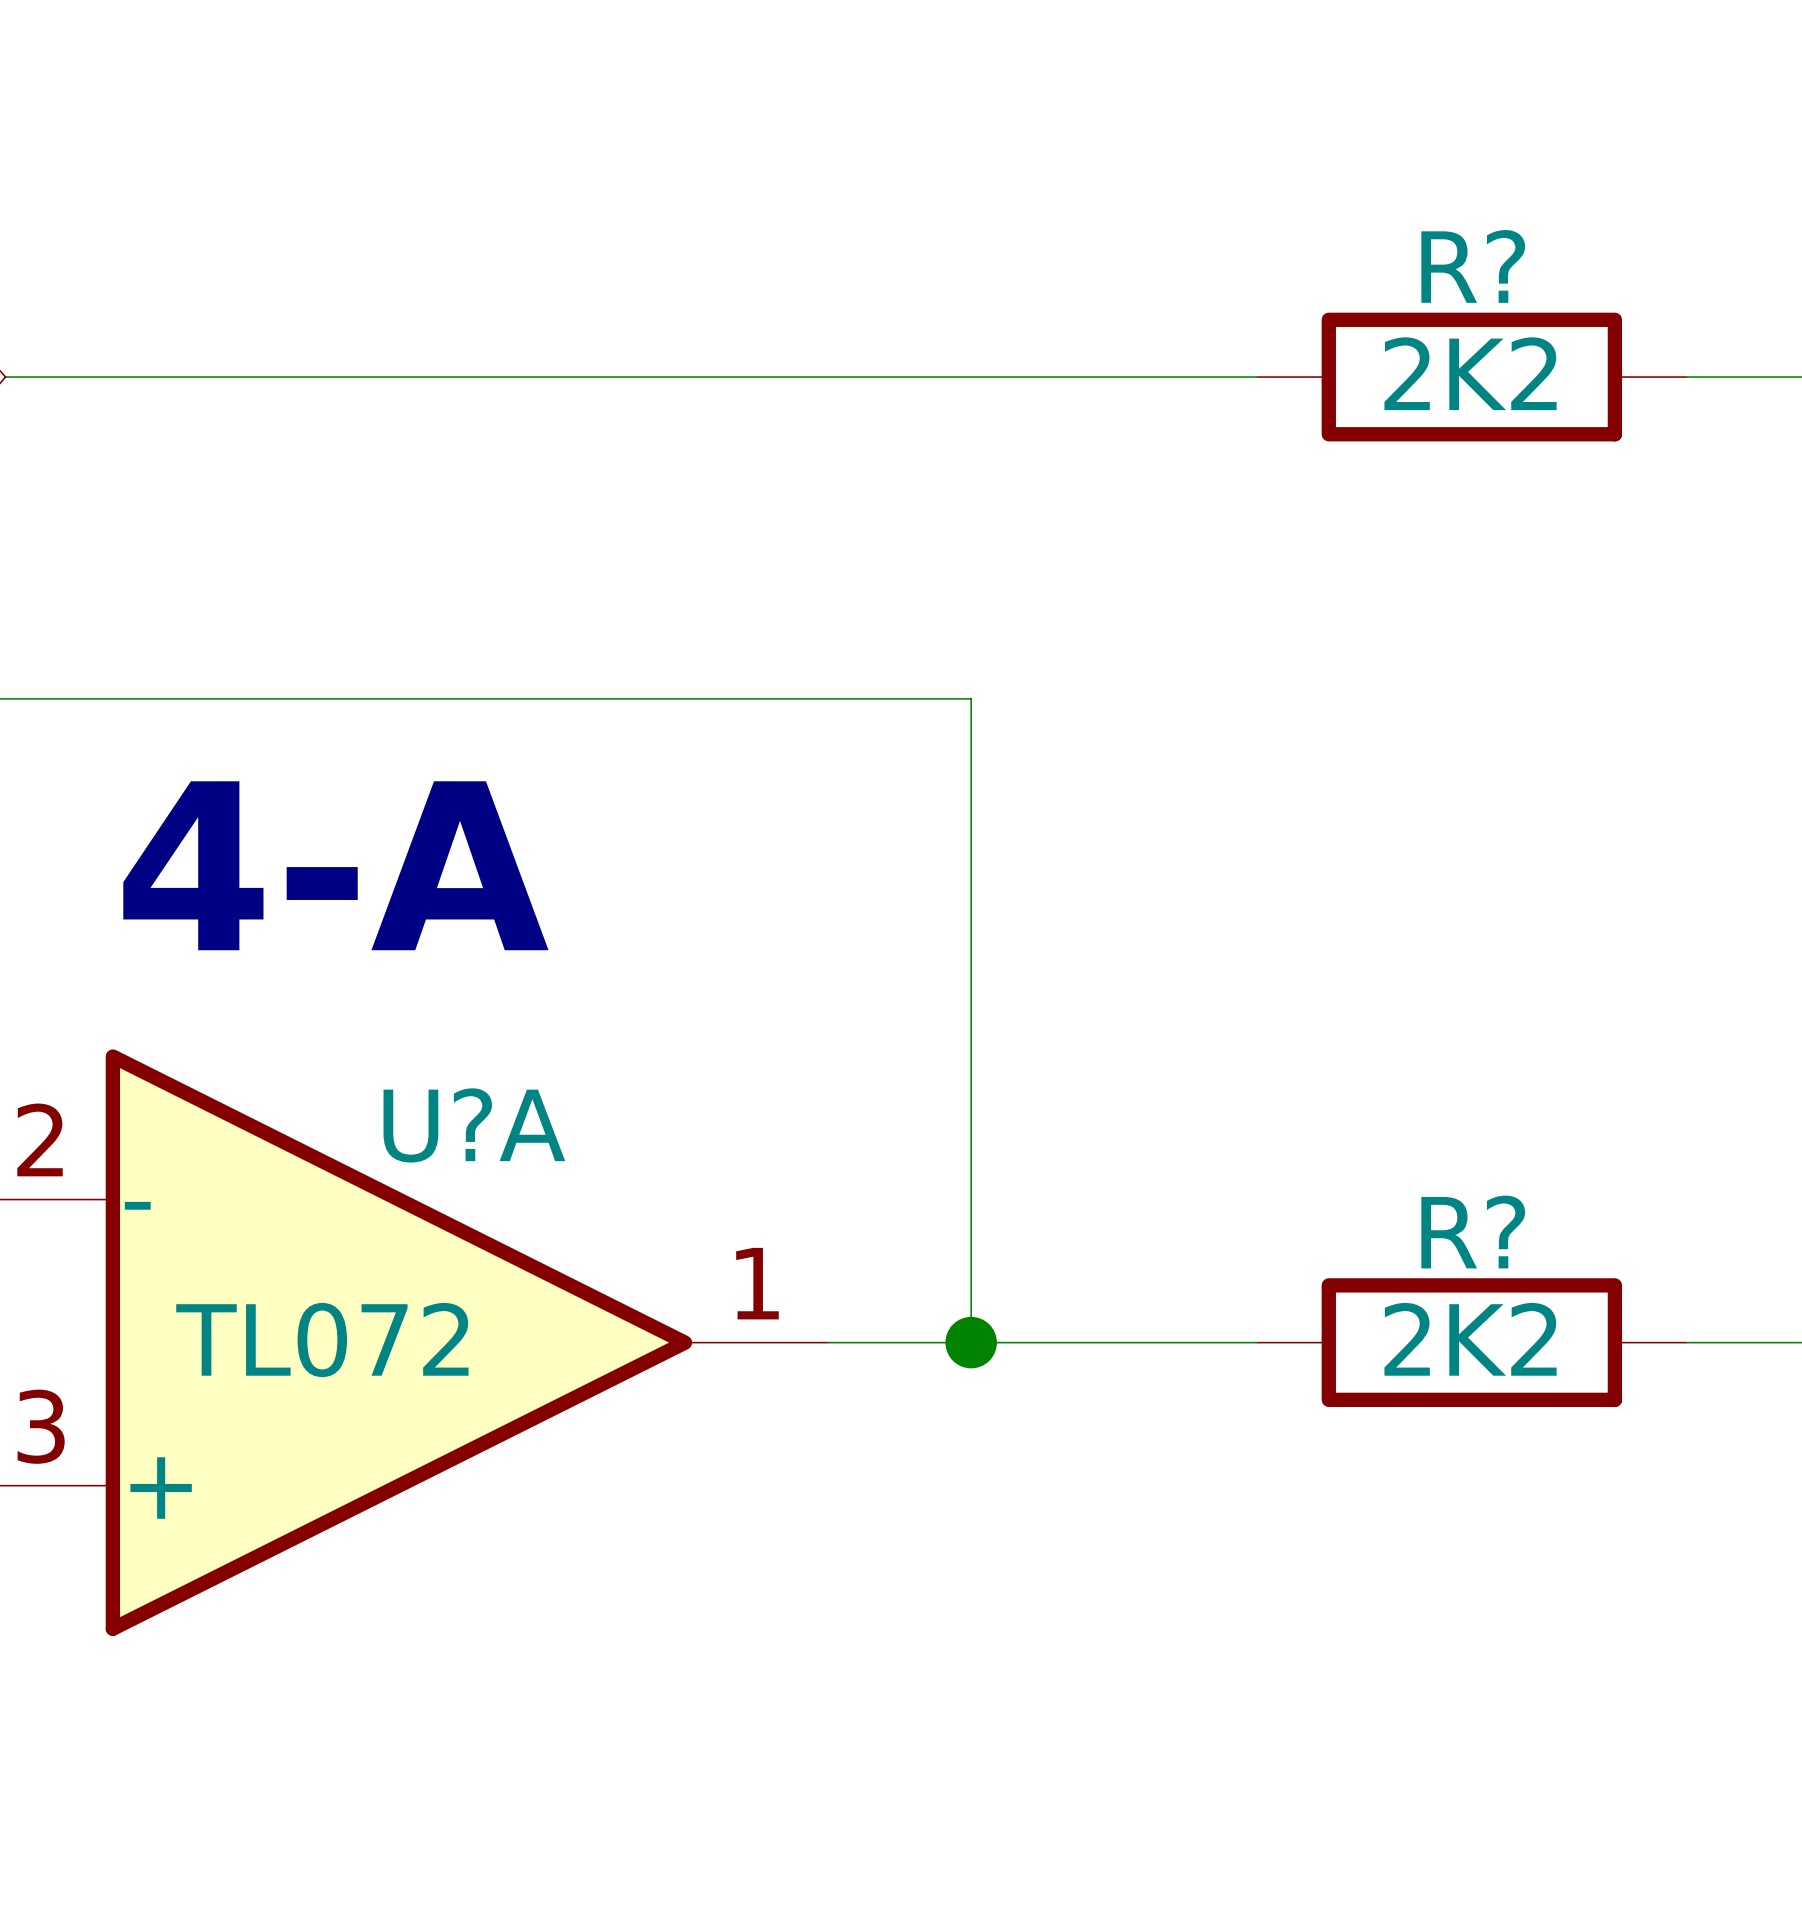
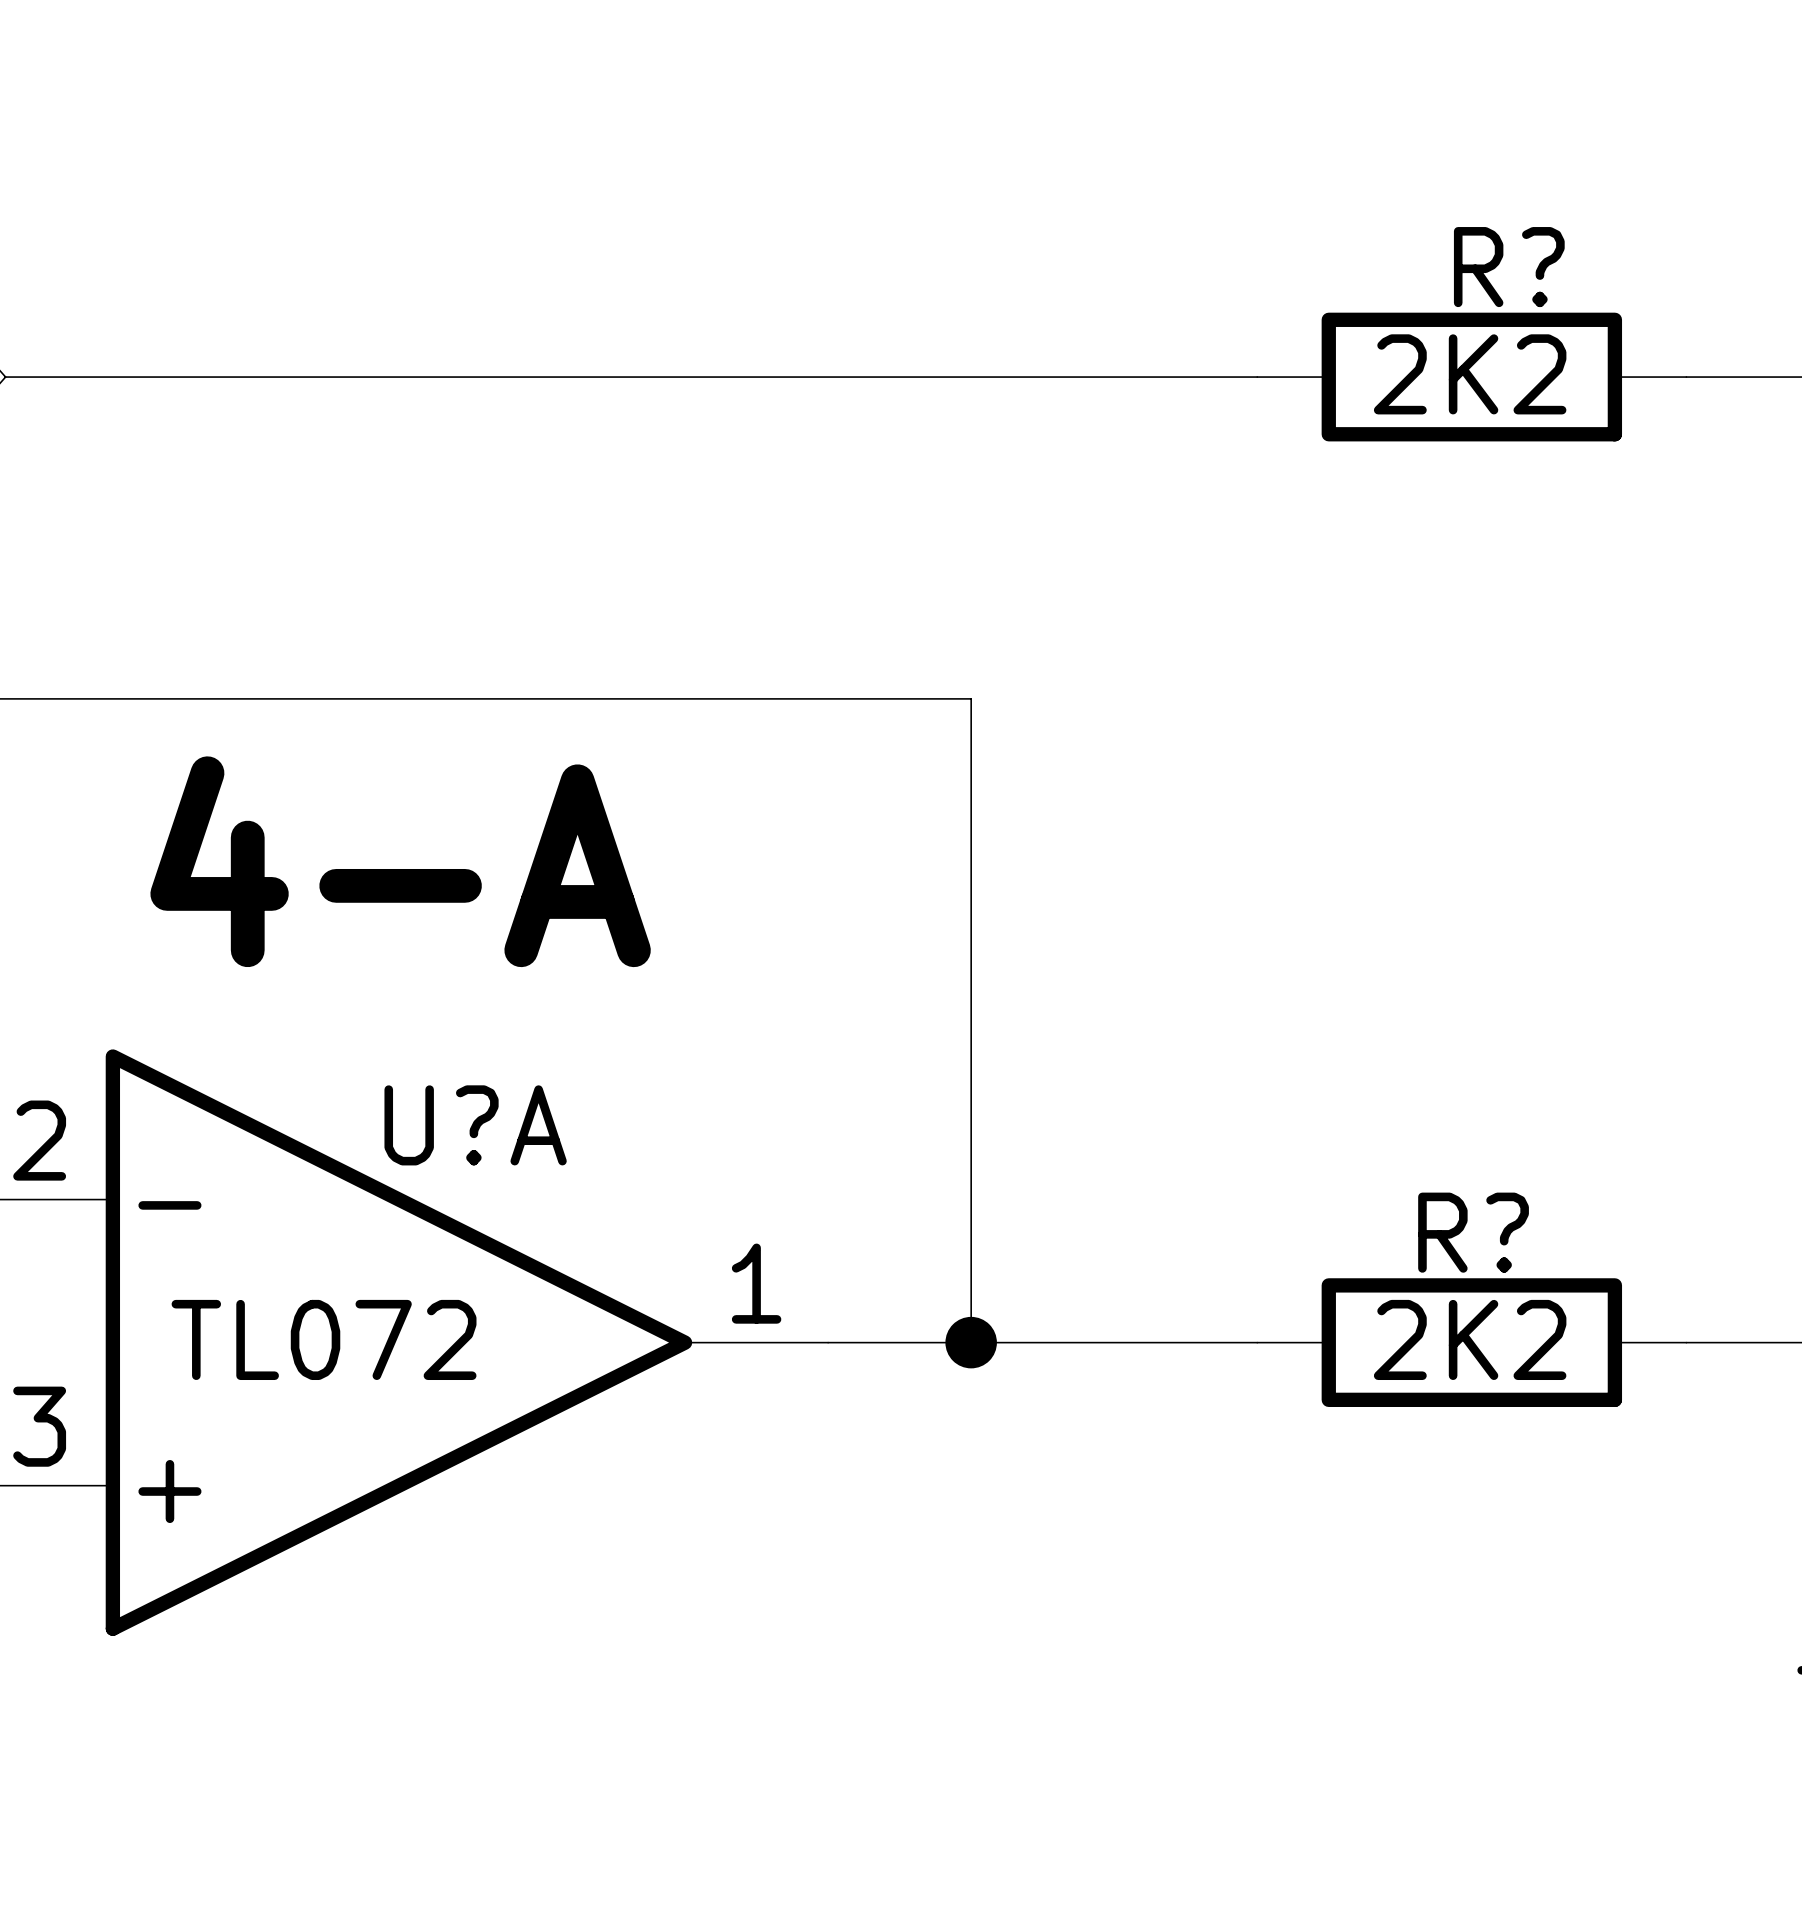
R? name position: R? (1473, 266) -> R? (1509, 267)

